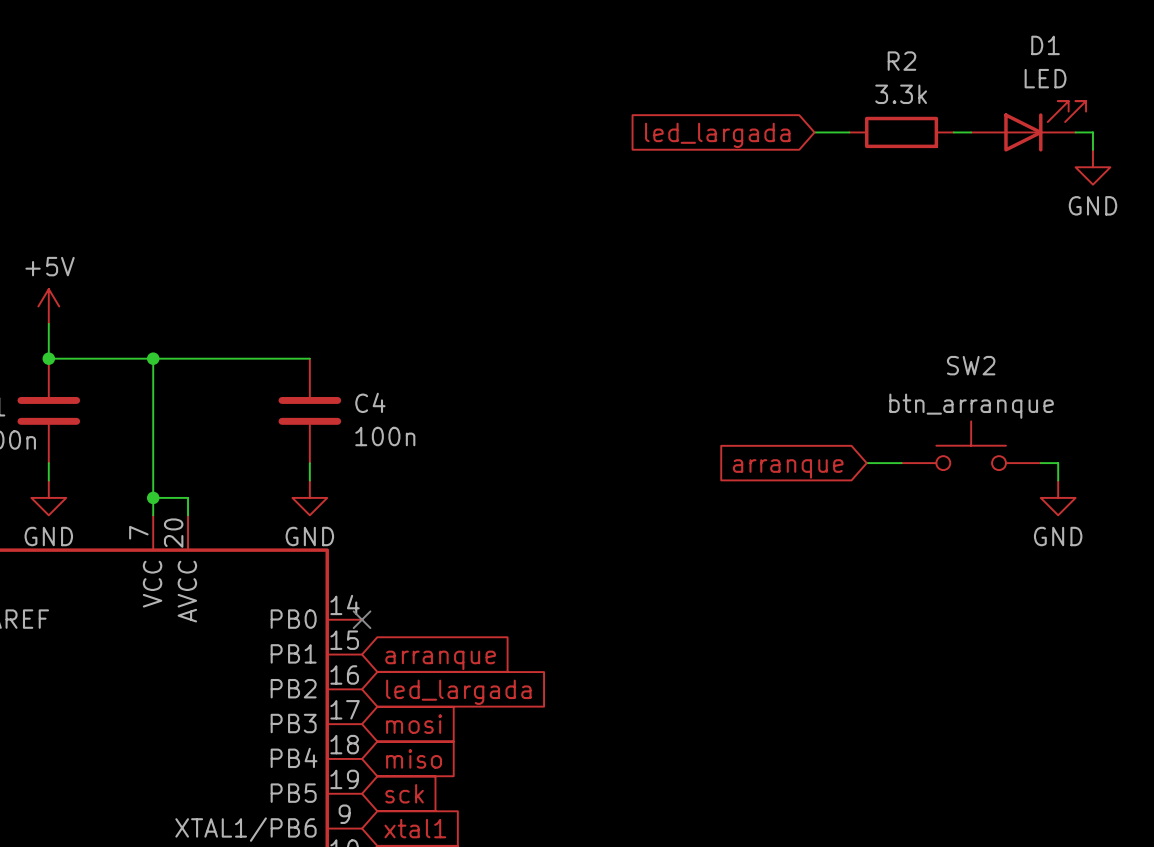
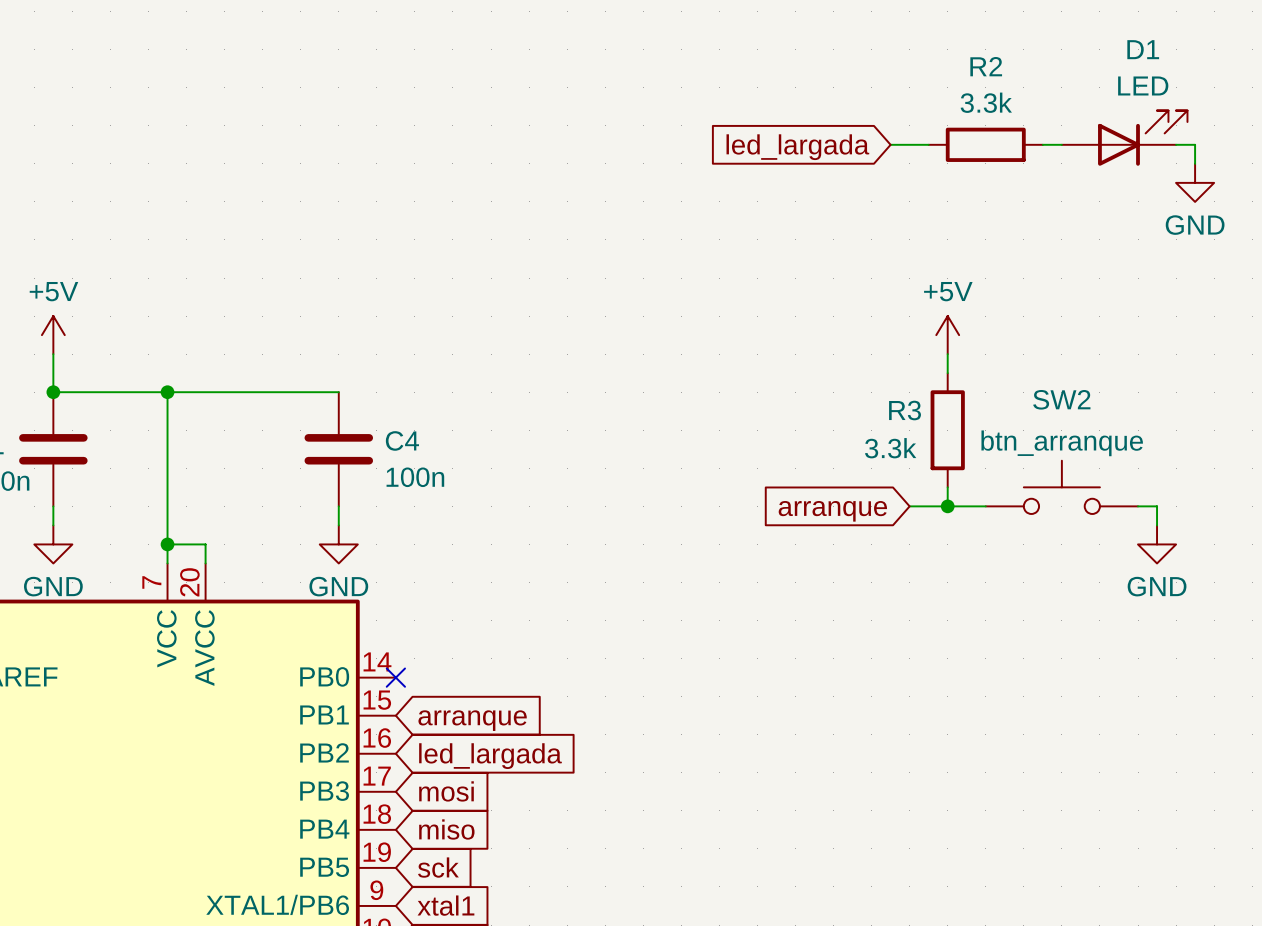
power symbol: none -> +5V (947, 335)
wire: none -> (947, 354) (947, 373)
R3: none -> 3.3k (947, 430)
wire: none -> (947, 487) (947, 506) (909, 506)
junction: none -> (947, 506)
global label position: arranque (788, 468) -> arranque (832, 511)

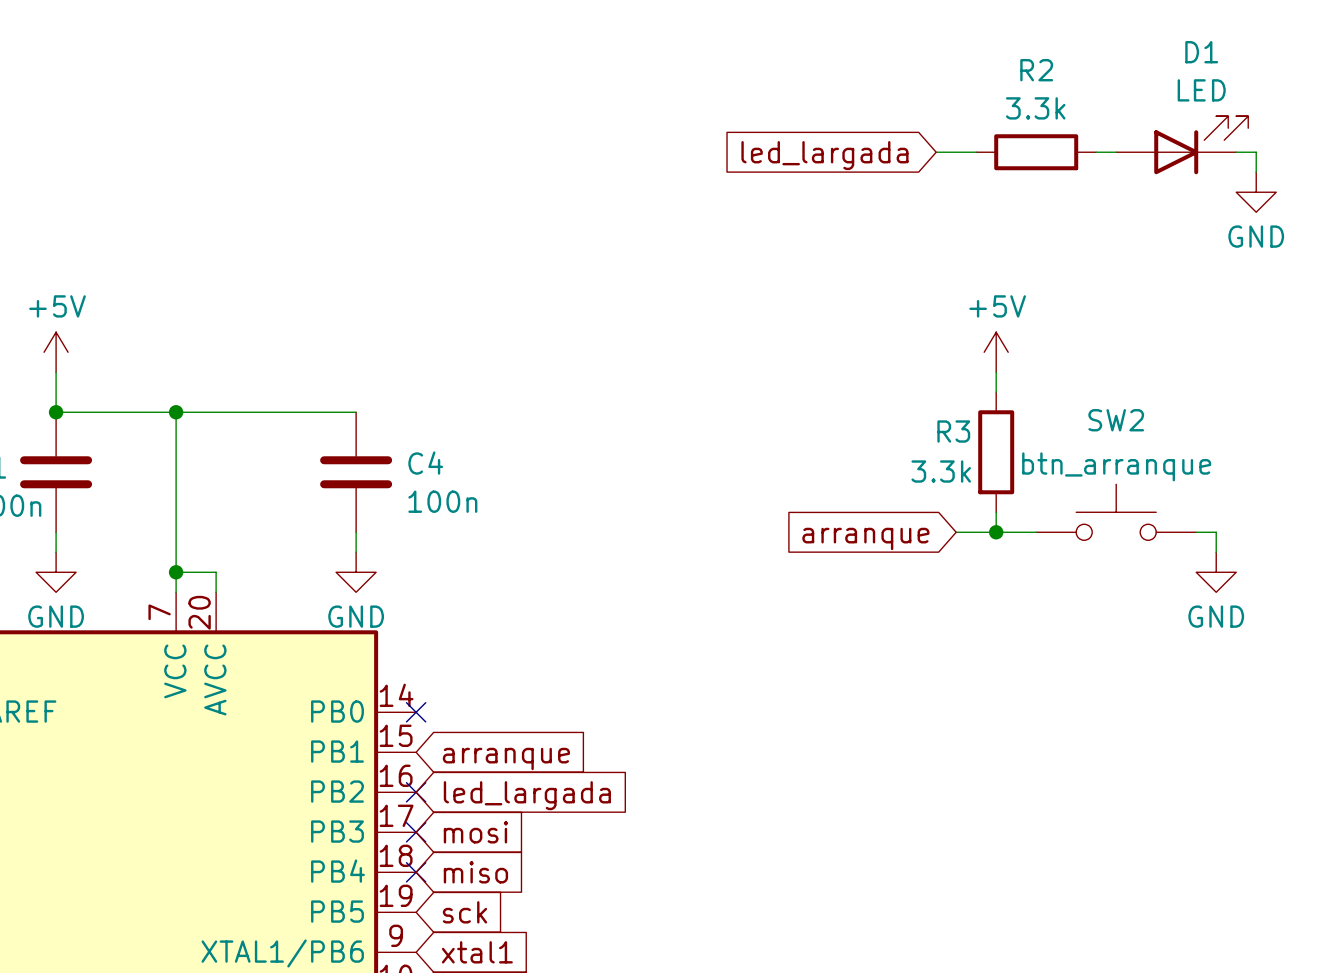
no-connect mark: none -> (416, 792)
no-connect mark: none -> (416, 832)
no-connect mark: none -> (416, 872)

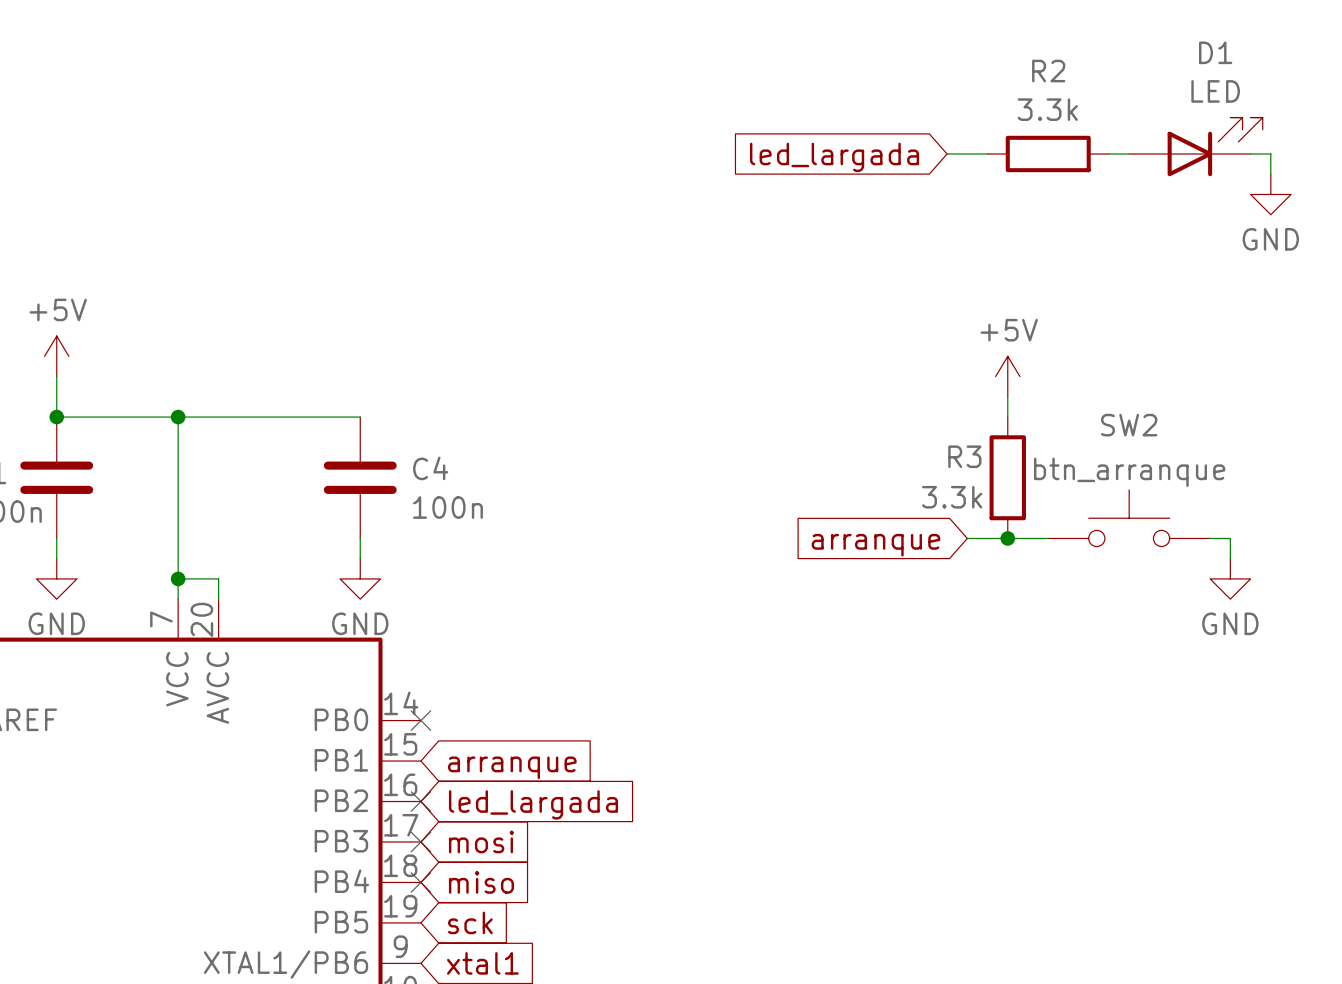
power symbol position: +5V (996, 352) -> +5V (1007, 376)
R3 position: (996, 452) -> (1007, 477)

